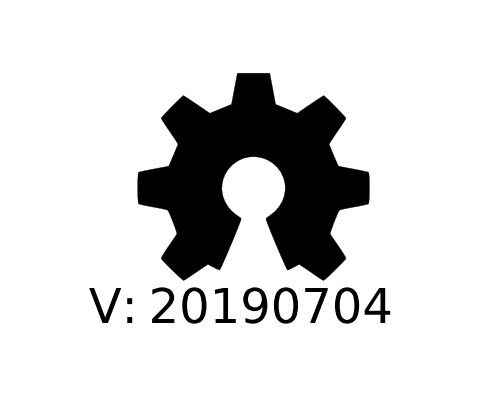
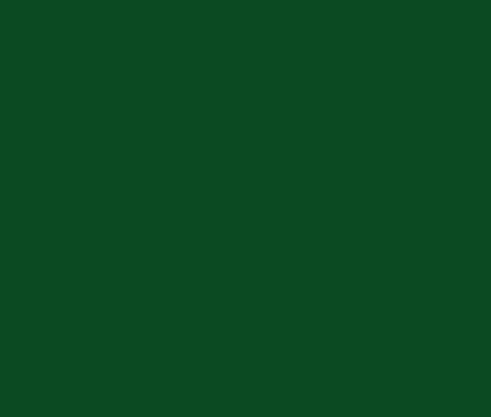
drawing: [137, 73, 370, 281] -> none

